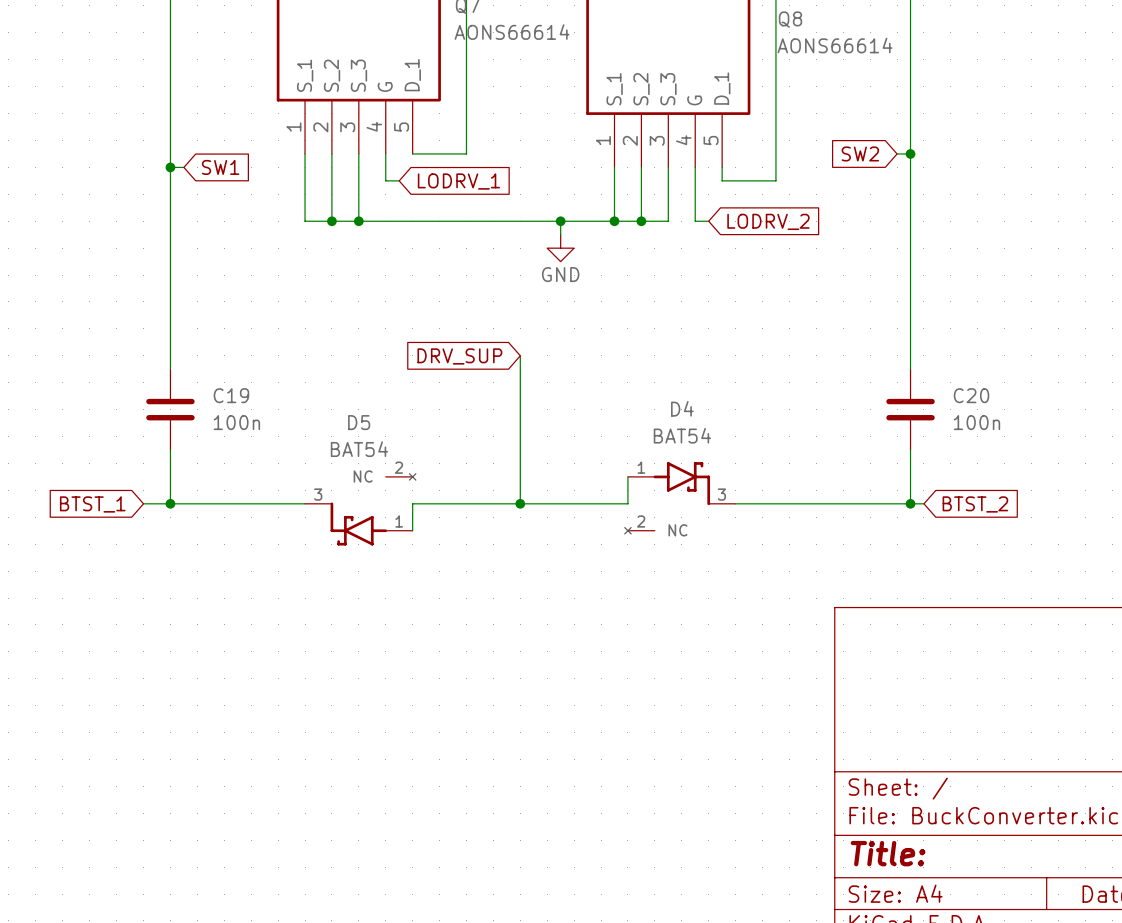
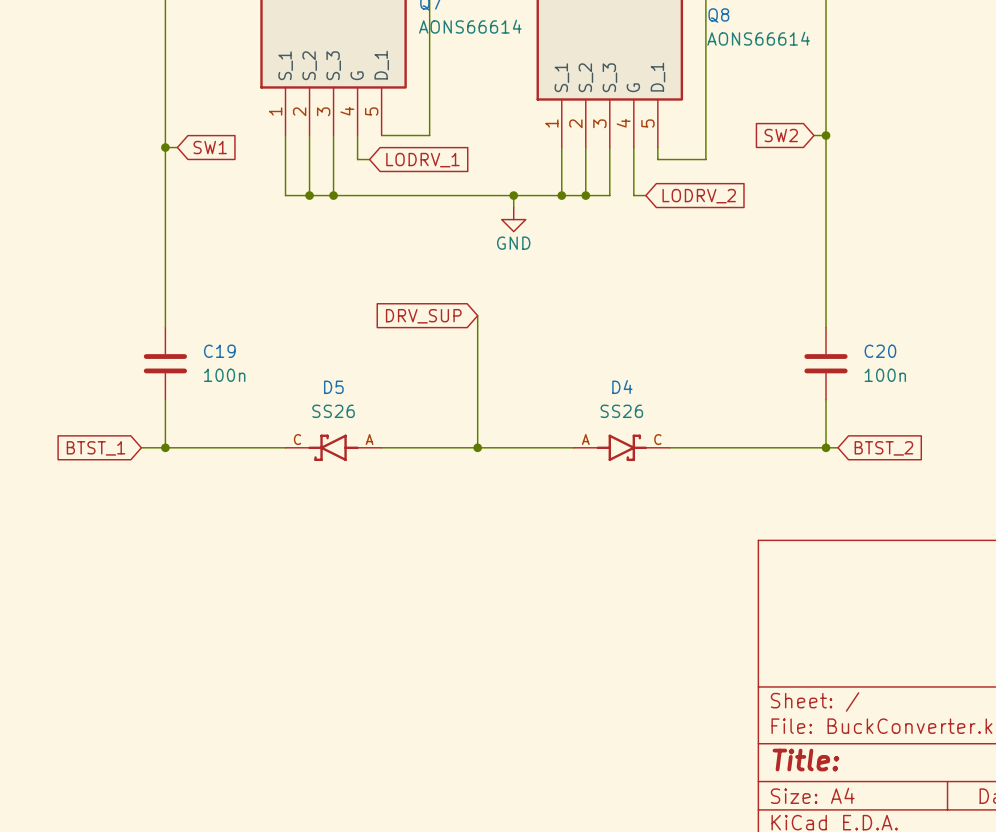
D4 value: BAT54 (682, 435) -> SS26 (621, 411)
D5 value: BAT54 (359, 449) -> SS26 (333, 411)
D4 symbol: [624, 462, 736, 534] -> [573, 434, 670, 462]
D5 symbol: [305, 473, 416, 546] -> [285, 434, 382, 462]
wire: (627, 476) (627, 503) -> none
wire: (412, 503) (412, 530) -> none

